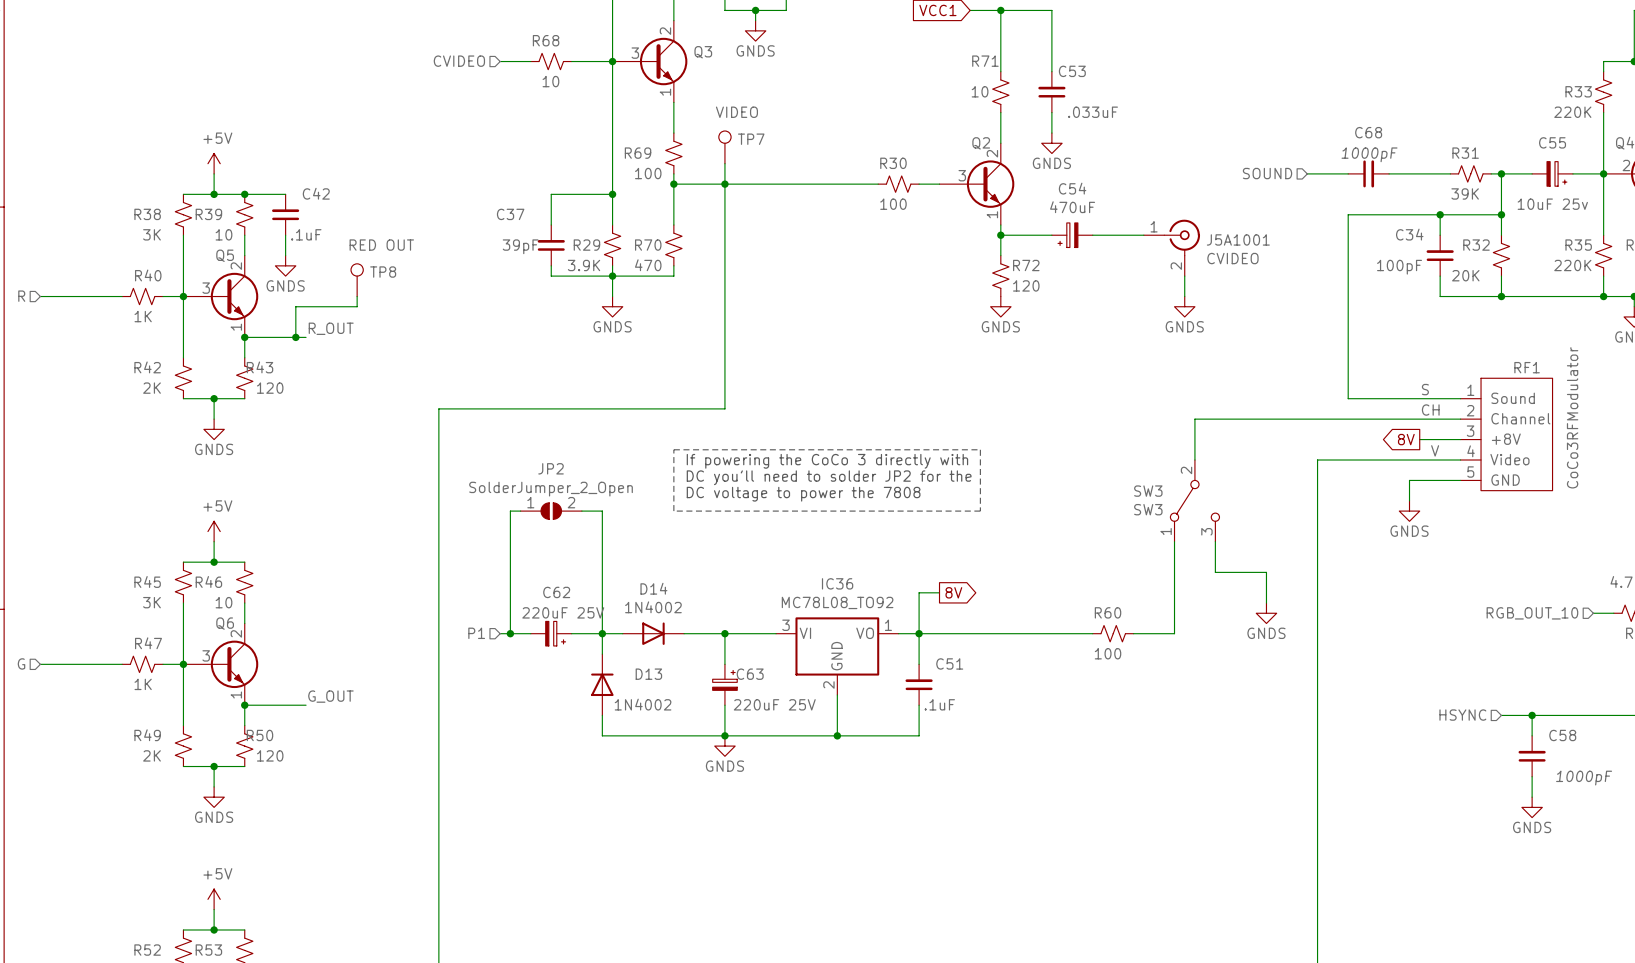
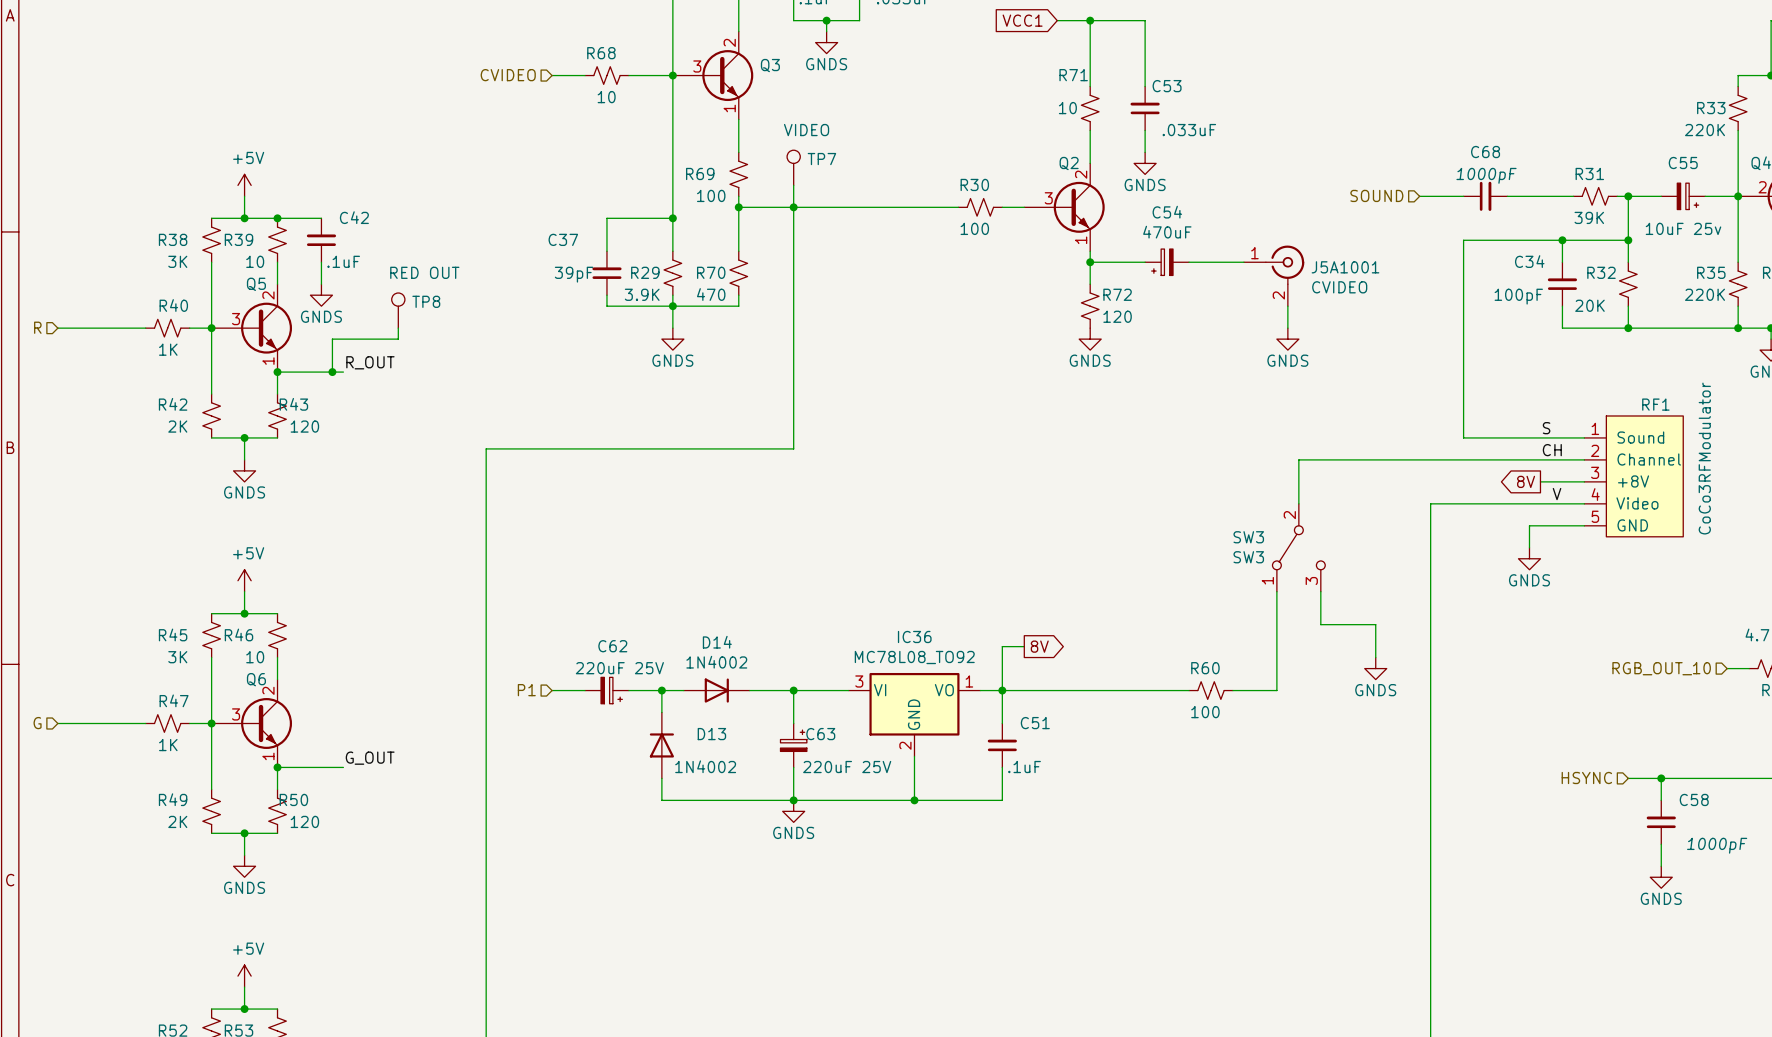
line: (673, 449) (980, 449) (980, 511) (673, 511) (673, 449) -> none
text: If powering the CoCo 3 directly with (827, 461) -> none
text: DC you'll need to solder JP2 for the (829, 477) -> none
text: DC voltage to power the 7808 (803, 494) -> none
wire: (520, 511) (510, 511) (510, 633) -> none
JP2: SolderJumper_2_Open (551, 511) -> none
wire: (581, 511) (602, 511) (602, 633) -> none
junction: (510, 633) -> none

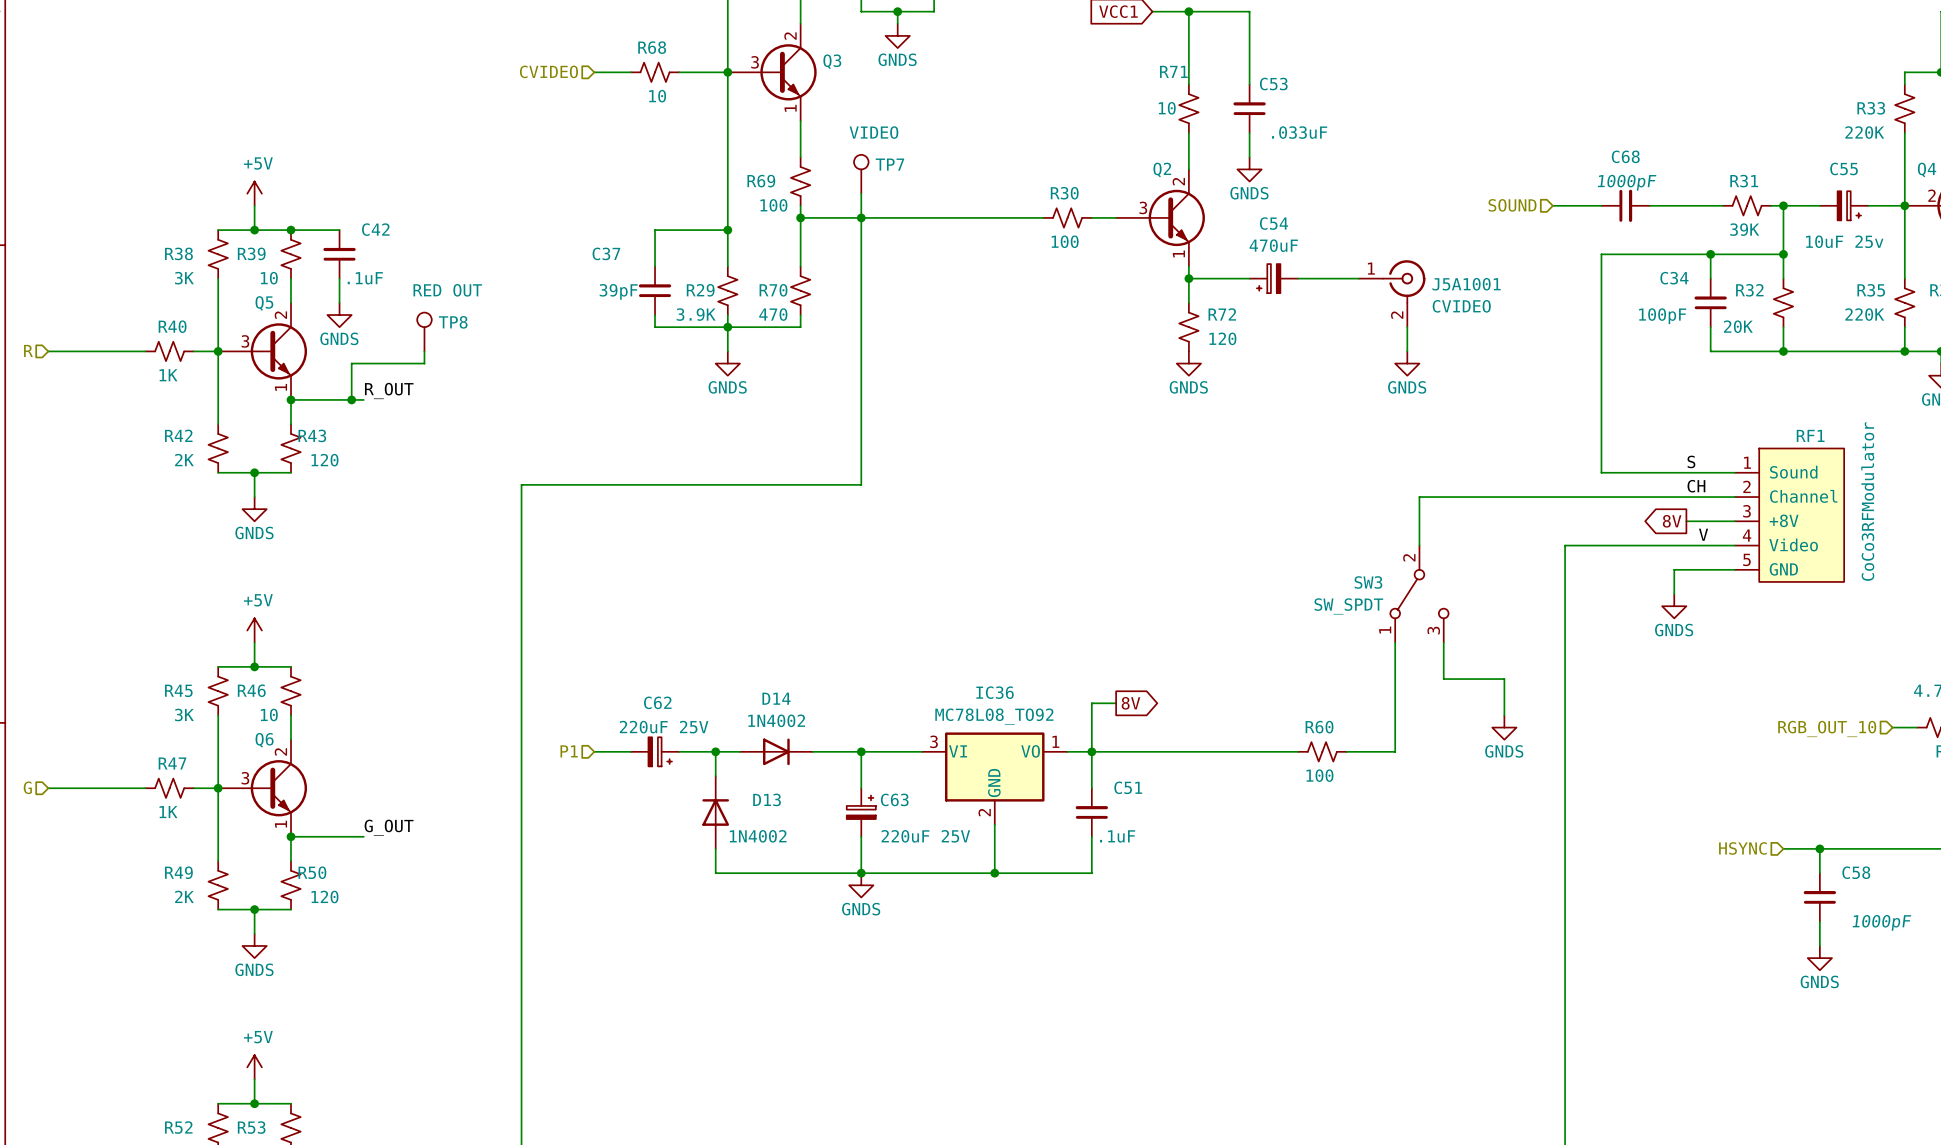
SW3 value: SW3 (1248, 557) -> SW_SPDT (1348, 606)

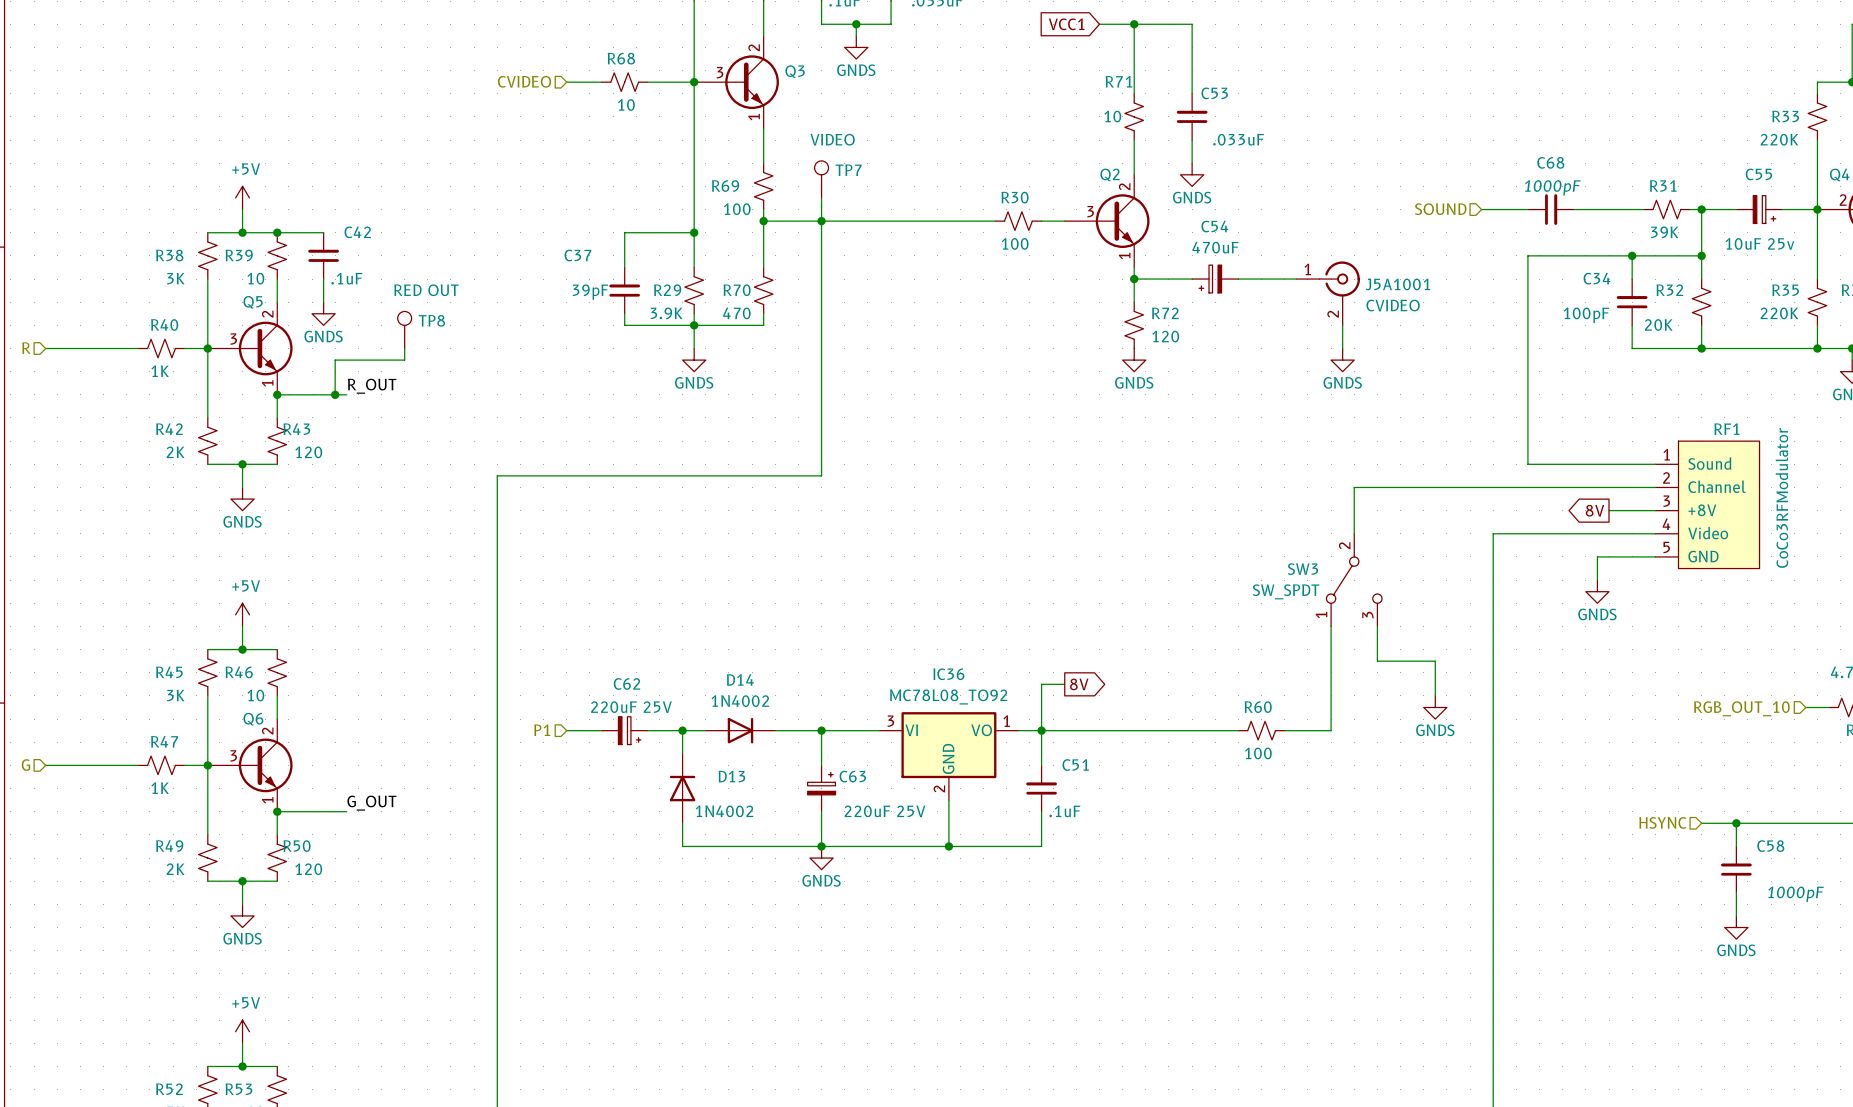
label: S (1691, 461) -> none
label: CH (1696, 486) -> none
label: V (1703, 534) -> none

